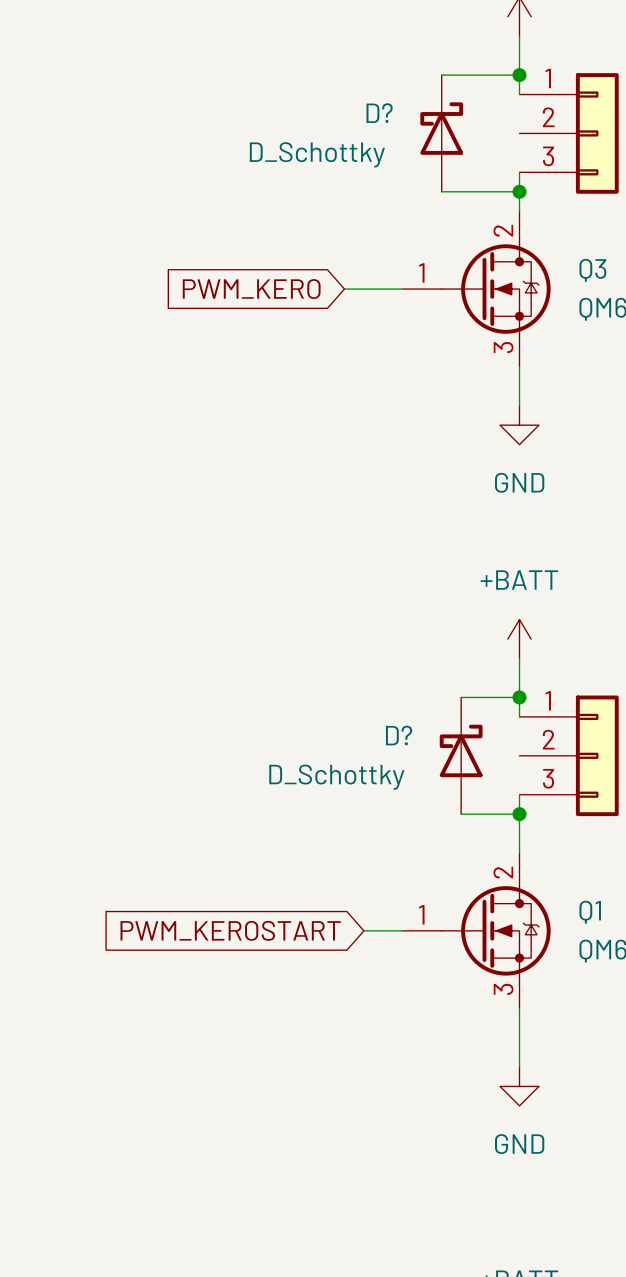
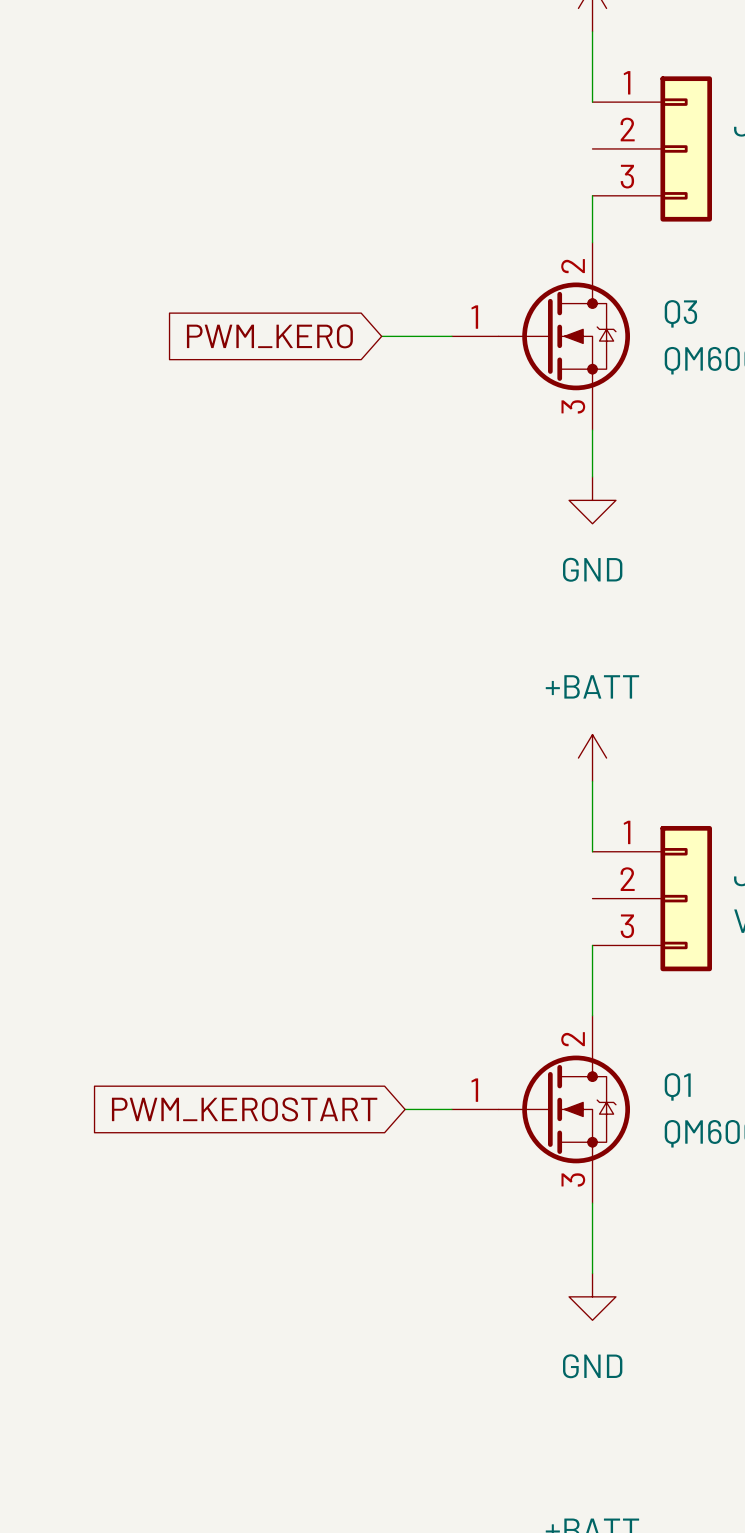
wire: (441, 75) (519, 75) -> none
junction: (519, 75) -> none
D?: D_Schottky (441, 133) -> none
wire: (441, 191) (519, 191) -> none
junction: (519, 191) -> none
wire: (461, 697) (519, 697) -> none
junction: (519, 697) -> none
D?: D_Schottky (461, 755) -> none
wire: (461, 814) (519, 814) -> none
junction: (519, 814) -> none

